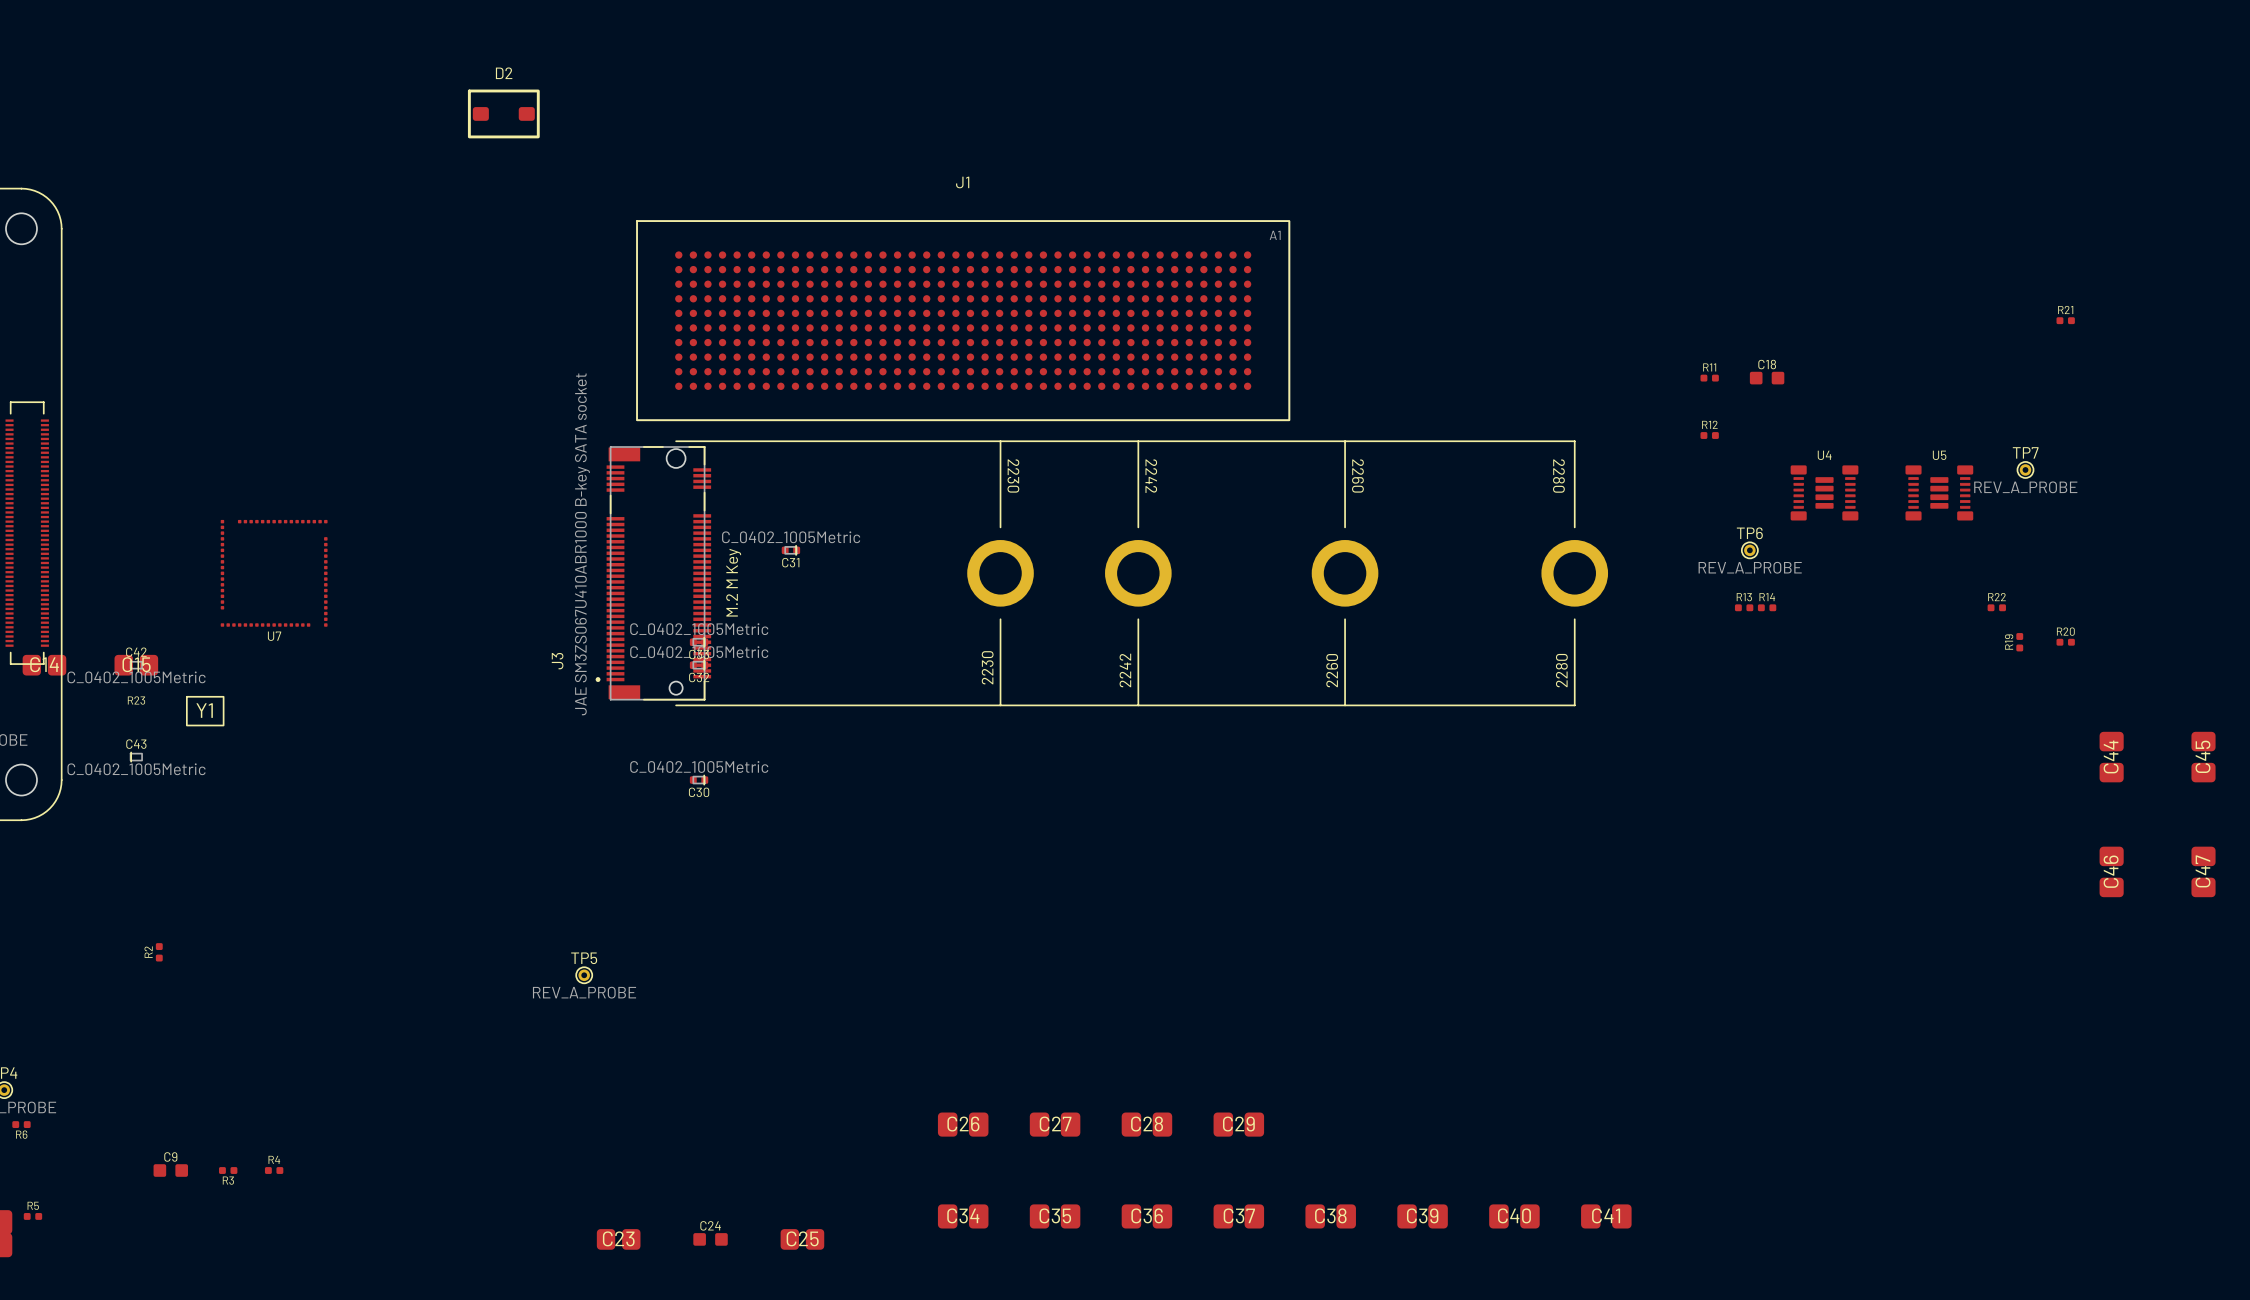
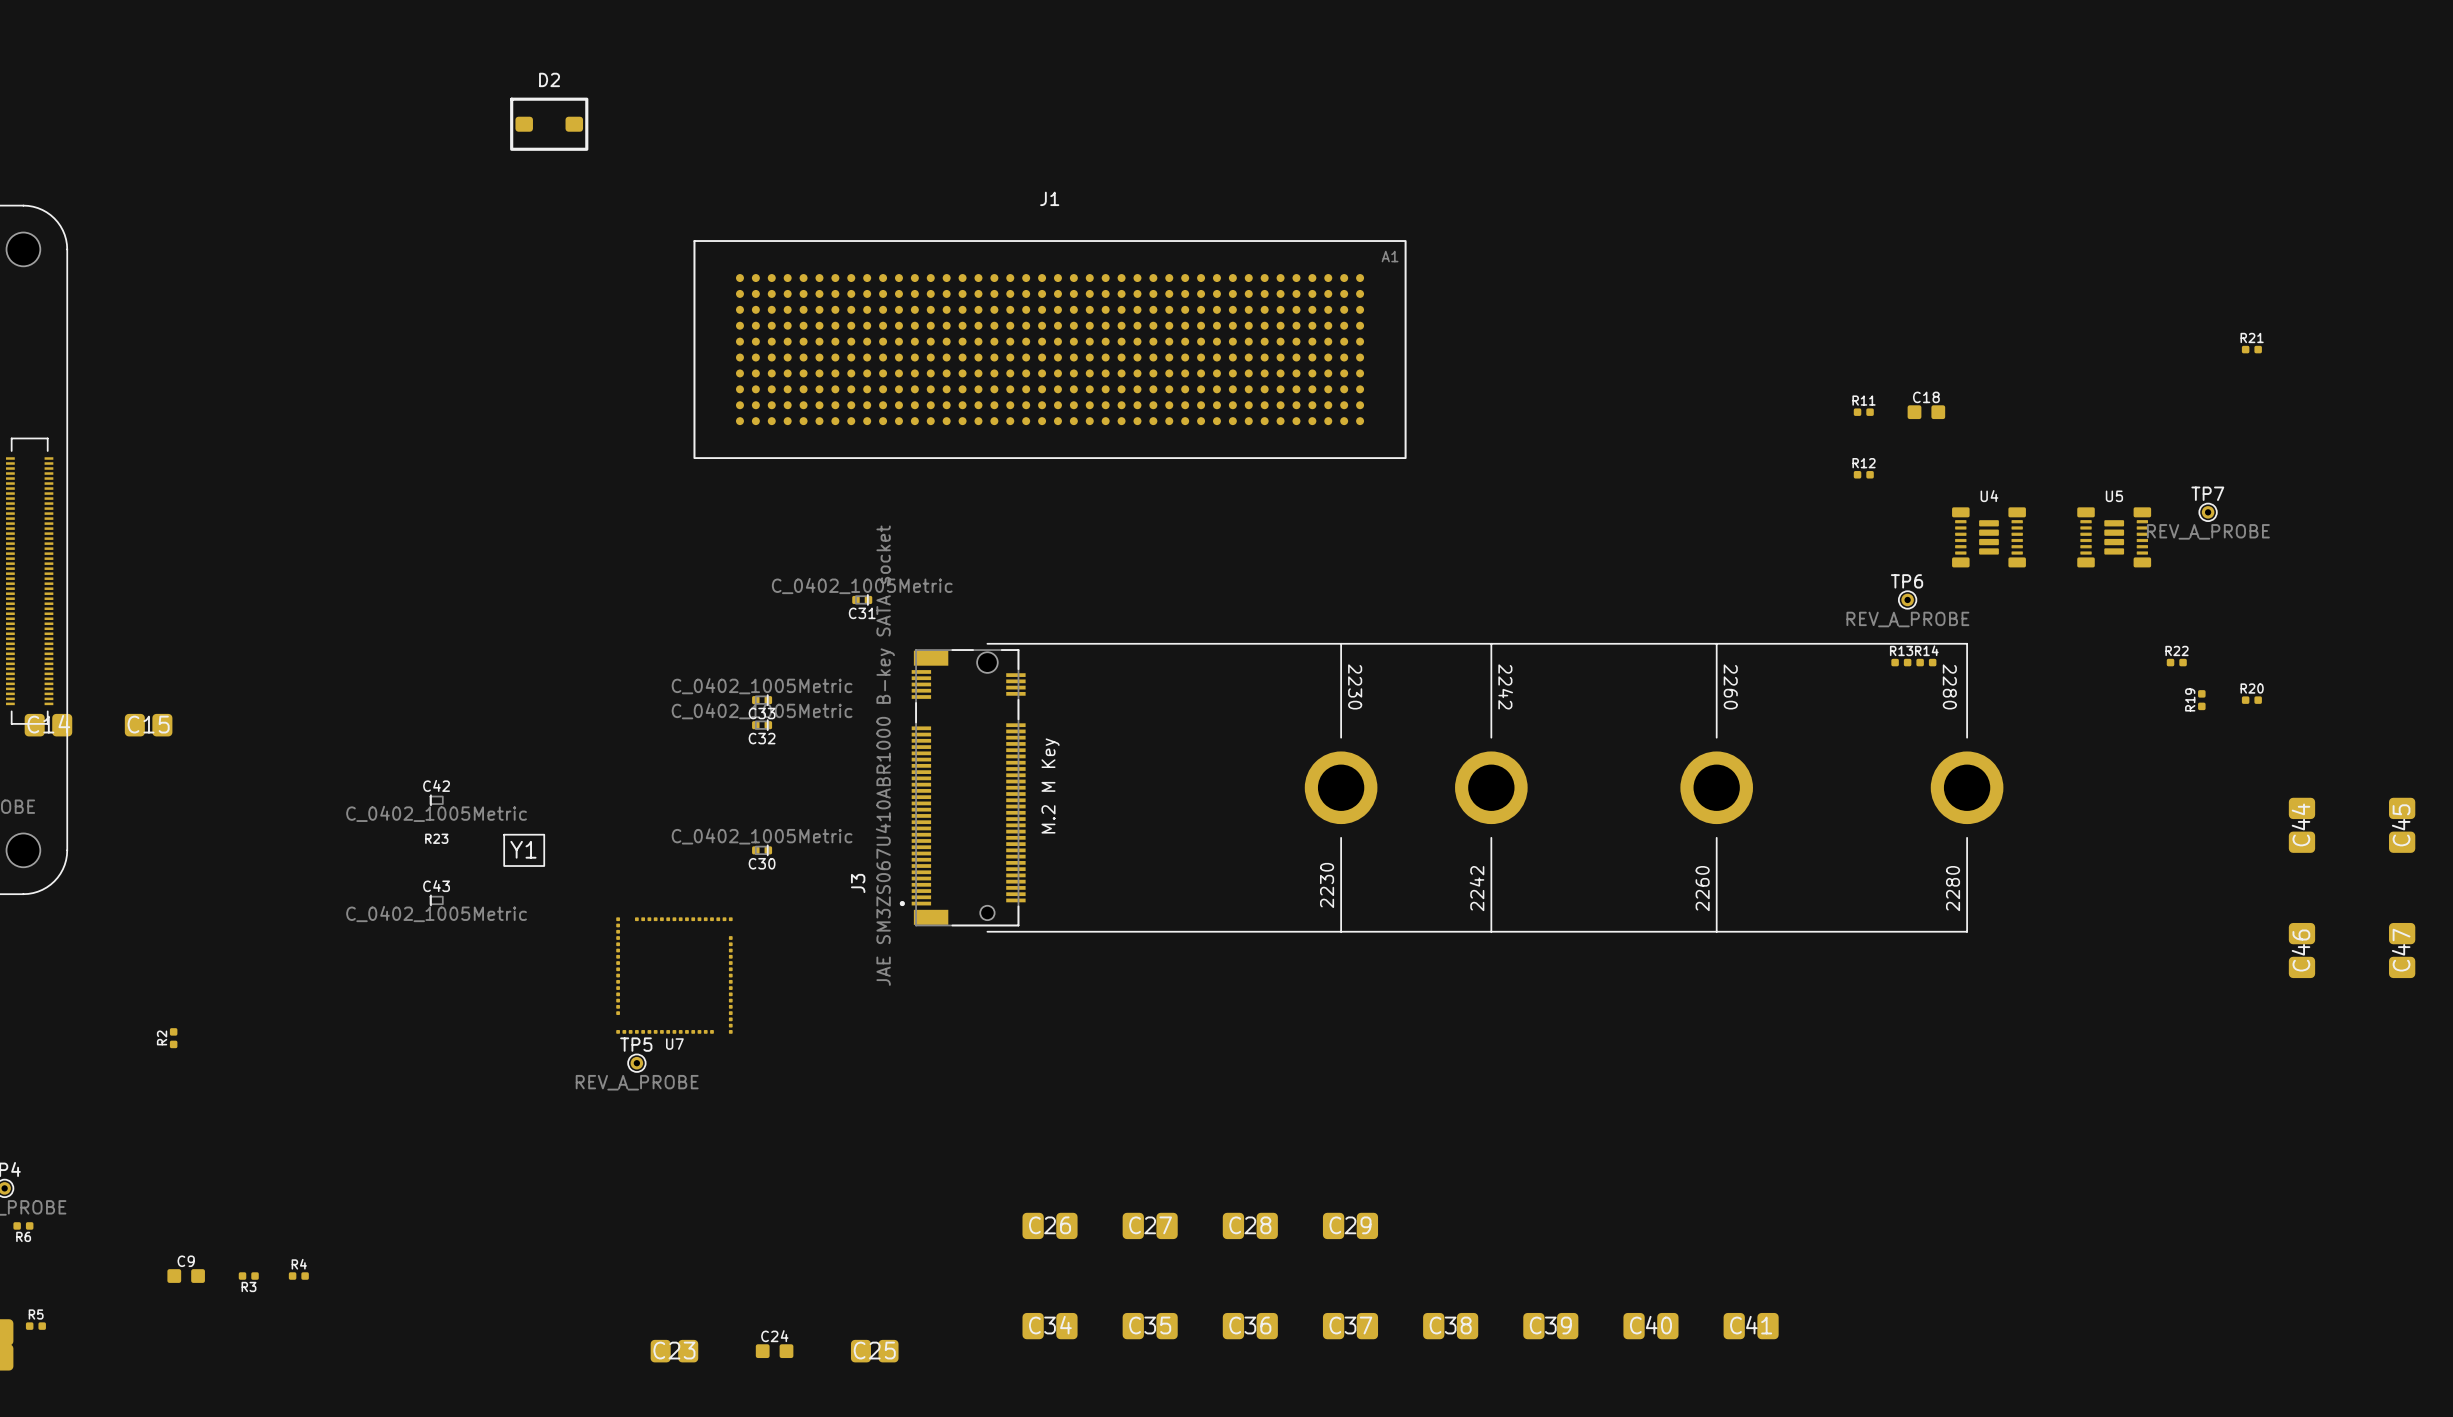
U7 position: (274, 573) -> (674, 975)
J3 position: (1101, 573) -> (1451, 787)
C42 position: (136, 665) -> (436, 800)
R23 position: (136, 700) -> (436, 838)
Y1 position: (205, 711) -> (524, 850)
C43 position: (136, 757) -> (436, 900)

